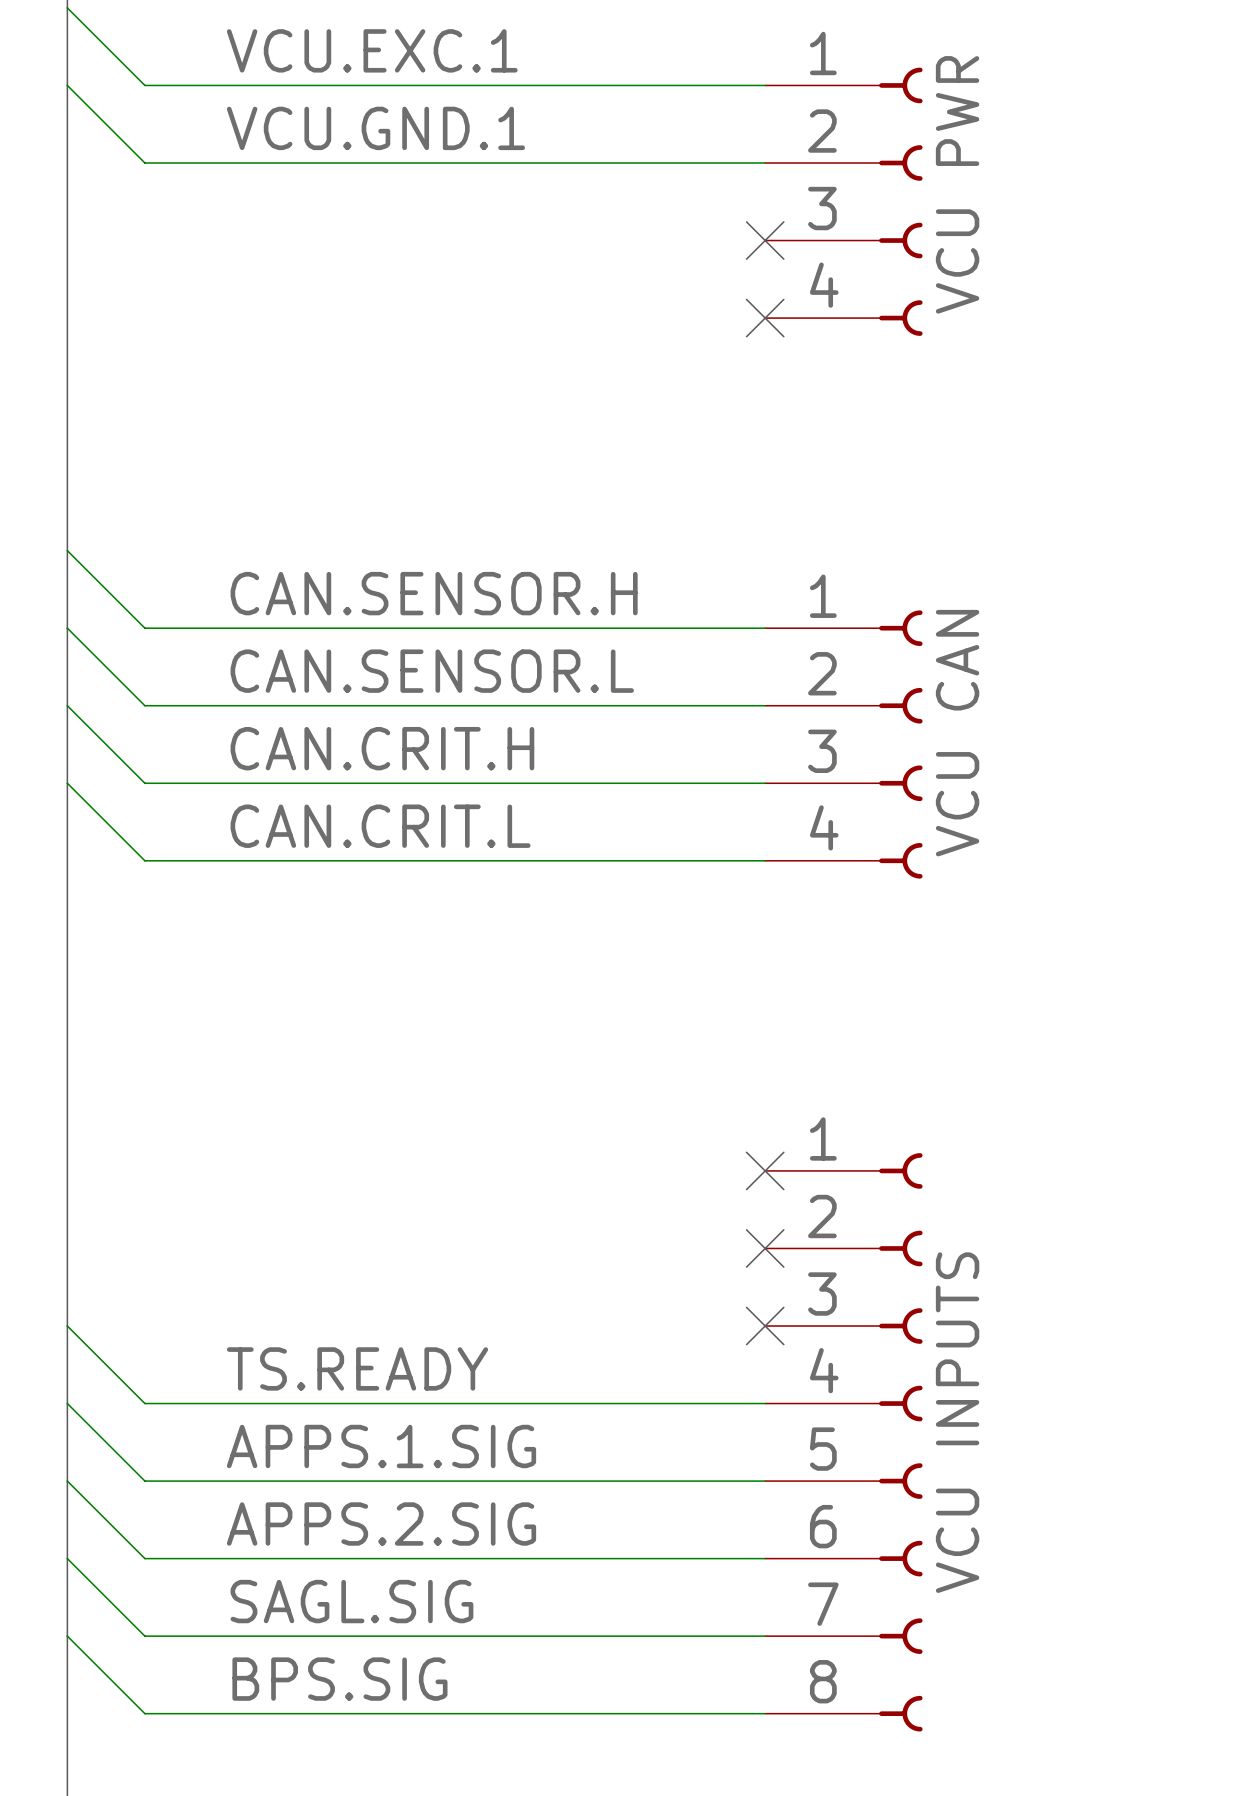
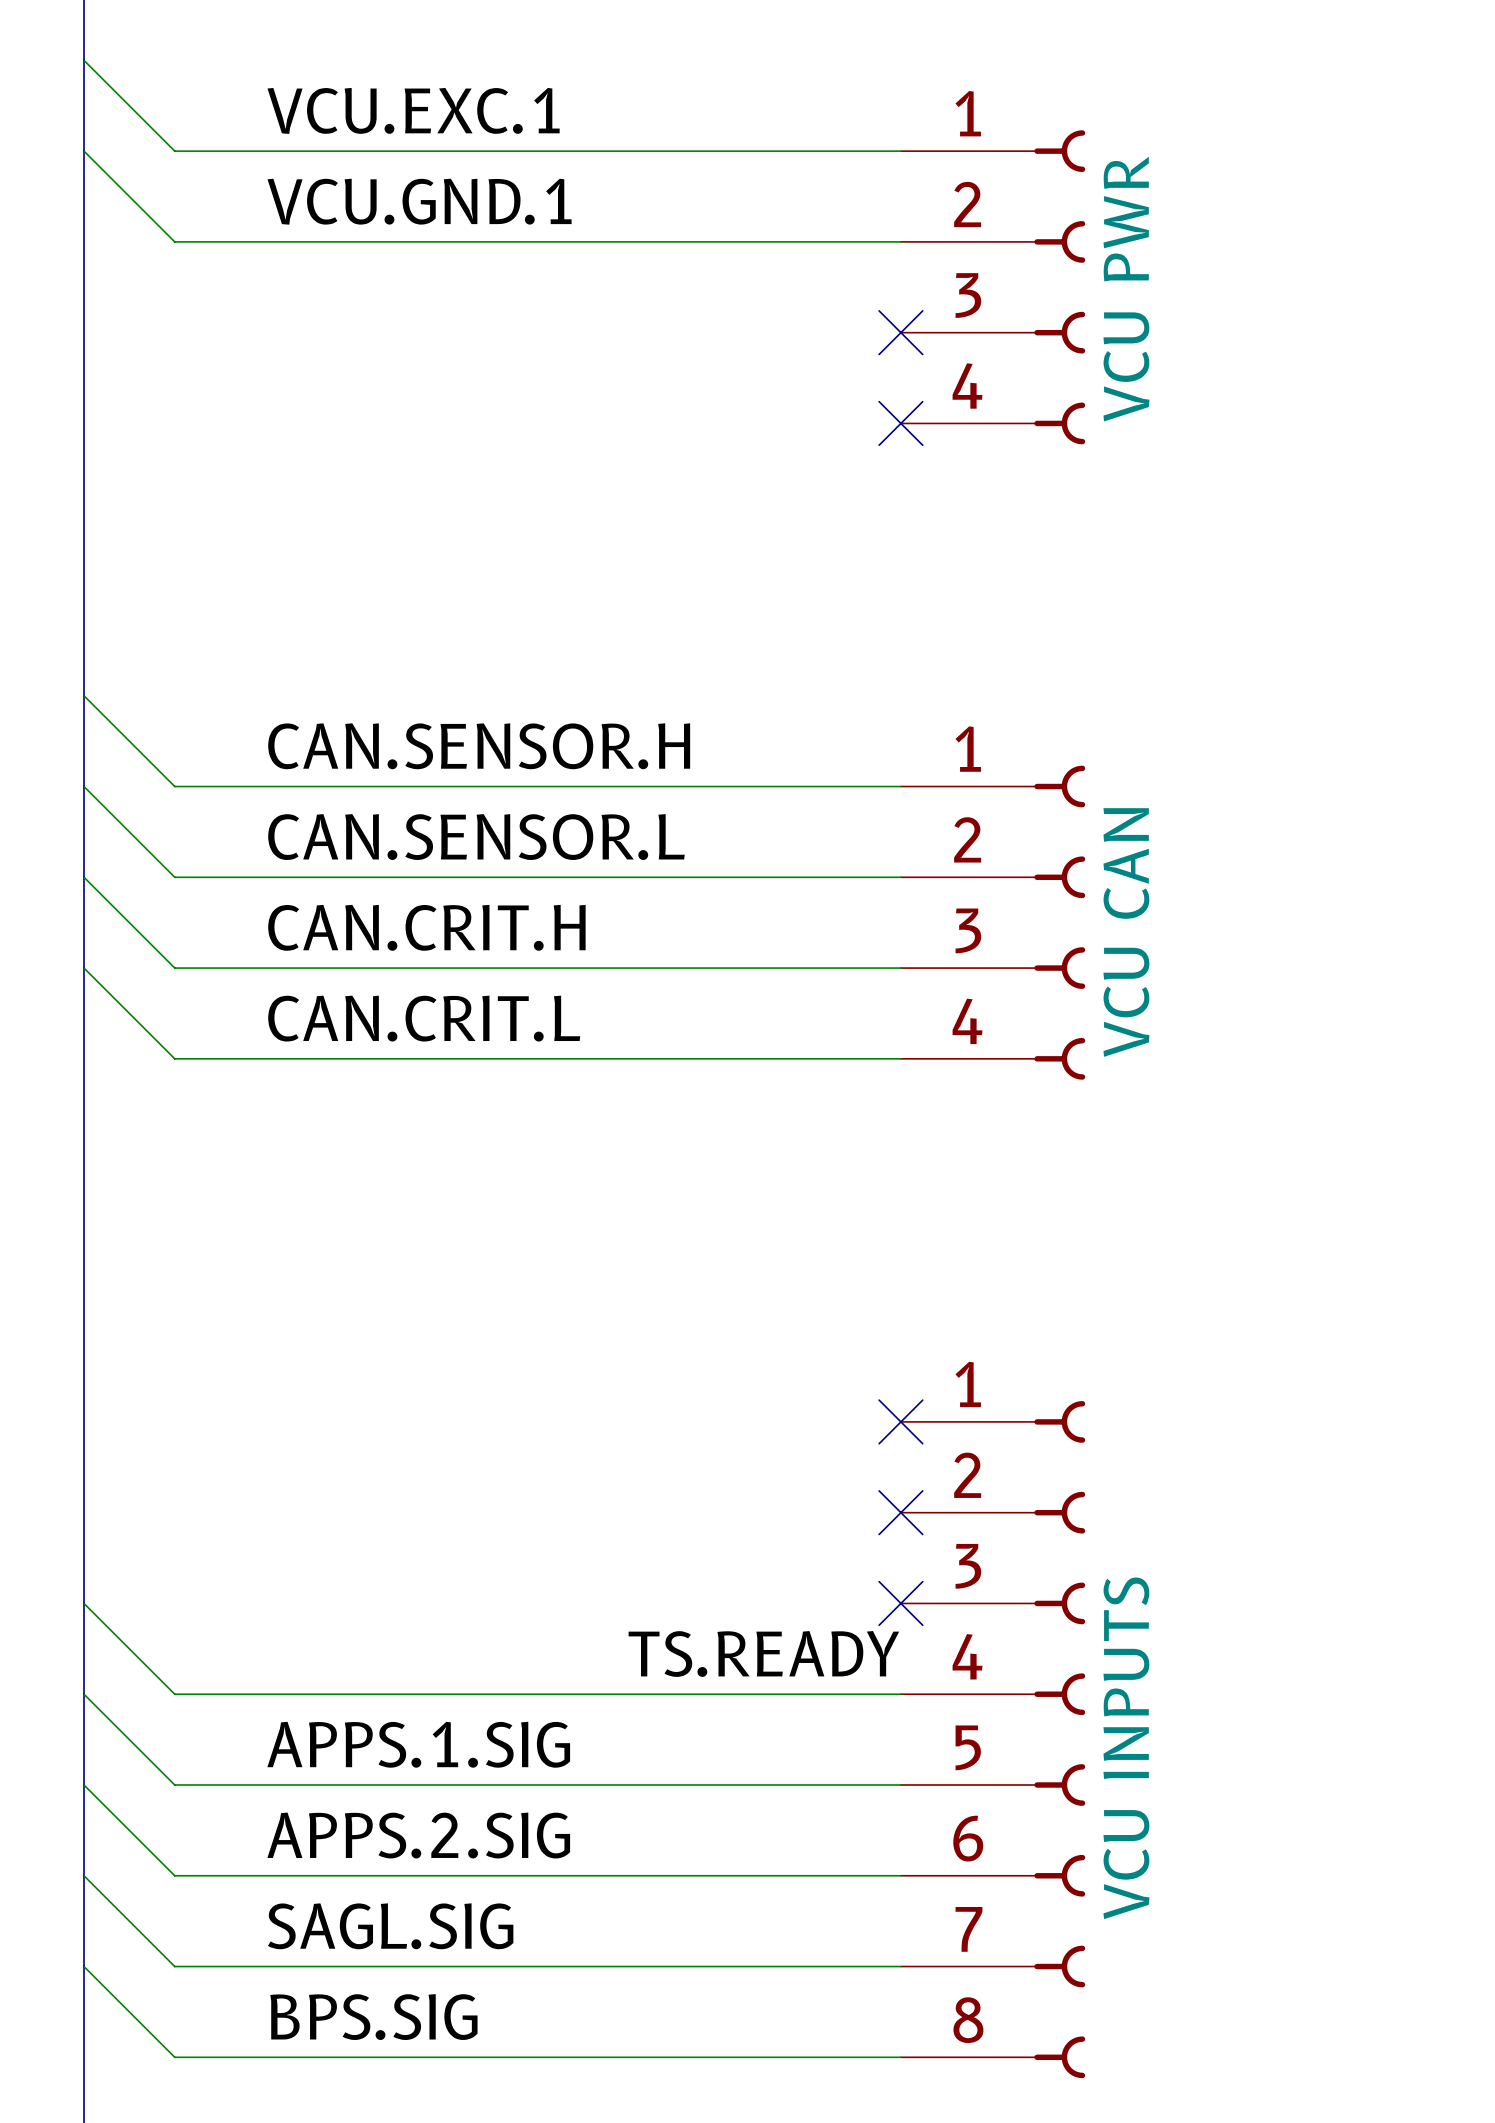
label position: TS.READY (357, 1368) -> TS.READY (763, 1653)

